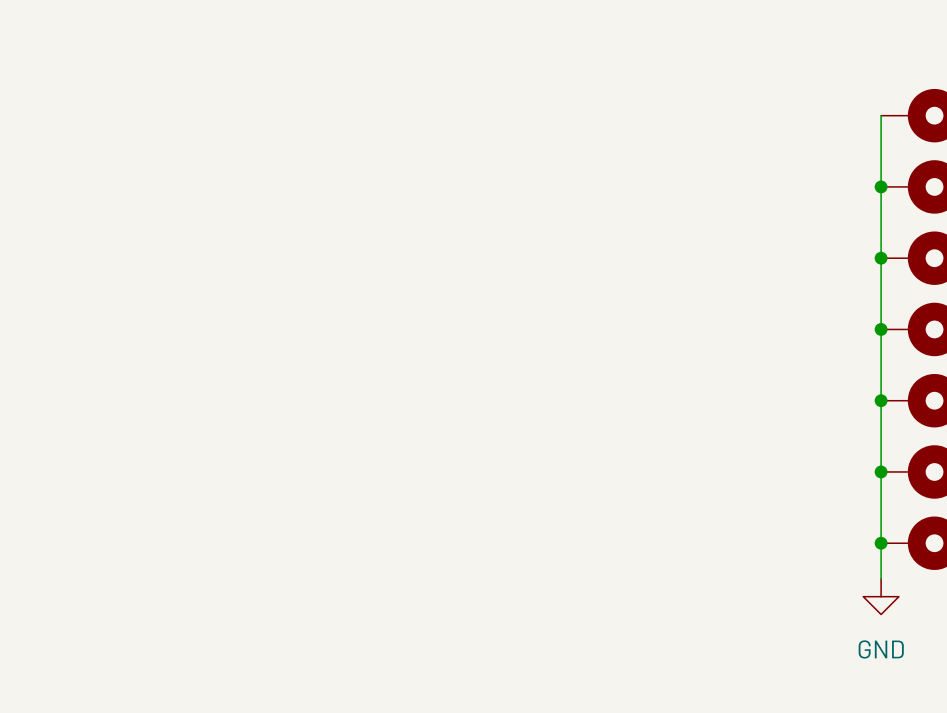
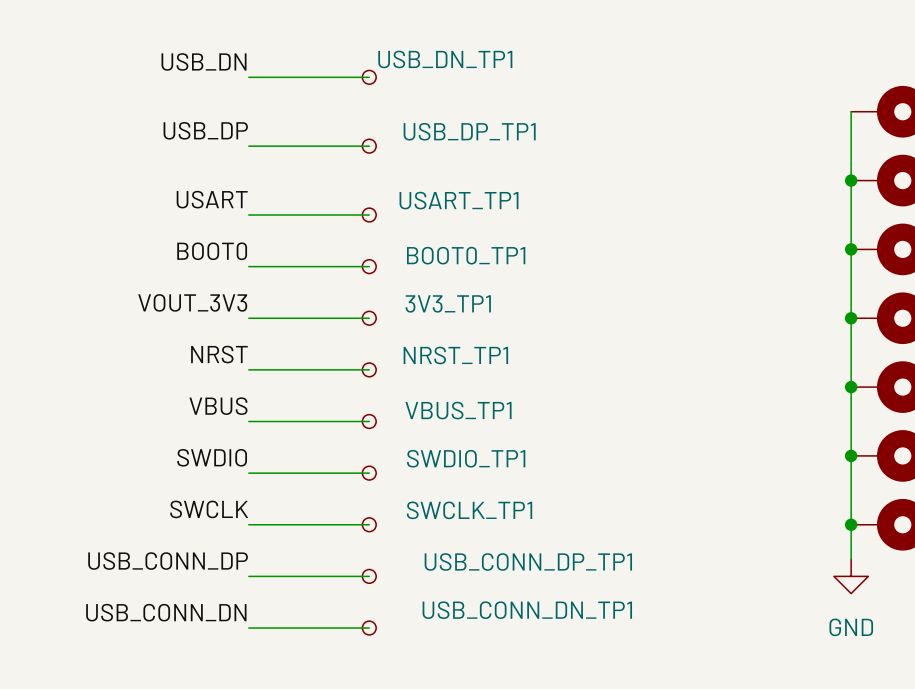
label: none -> USB_DN (204, 61)
wire: none -> (248, 77) (369, 77)
USB_DN_TP1: none -> (369, 77)
label: none -> USB_DP (205, 130)
wire: none -> (248, 146) (369, 146)
USB_DP_TP1: none -> (369, 146)
label: none -> USART (212, 199)
wire: none -> (248, 214) (369, 214)
USART_TP1: none -> (369, 214)
label: none -> BOOT0 (212, 251)
wire: none -> (248, 266) (369, 266)
BOOT0_TP1: none -> (369, 266)
label: none -> VOUT_3V3 (192, 302)
wire: none -> (248, 318) (369, 318)
3V3_TP1: none -> (369, 318)
label: none -> NRST (219, 354)
wire: none -> (248, 369) (369, 369)
NRST_TP1: none -> (369, 369)
label: none -> VBUS (218, 406)
wire: none -> (248, 421) (369, 421)
VBUS_TP1: none -> (369, 421)
label: none -> SWDIO (212, 457)
wire: none -> (248, 473) (369, 473)
SWDIO_TP1: none -> (369, 473)
label: none -> SWCLK (209, 509)
wire: none -> (248, 524) (369, 524)
SWCLK_TP1: none -> (369, 524)
label: none -> USB_CONN_DP (168, 561)
wire: none -> (248, 576) (369, 576)
USB_CONN_DP_TP1: none -> (369, 576)
label: none -> USB_CONN_DN (166, 612)
wire: none -> (248, 628) (369, 628)
USB_CONN_DN_TP1: none -> (369, 628)

